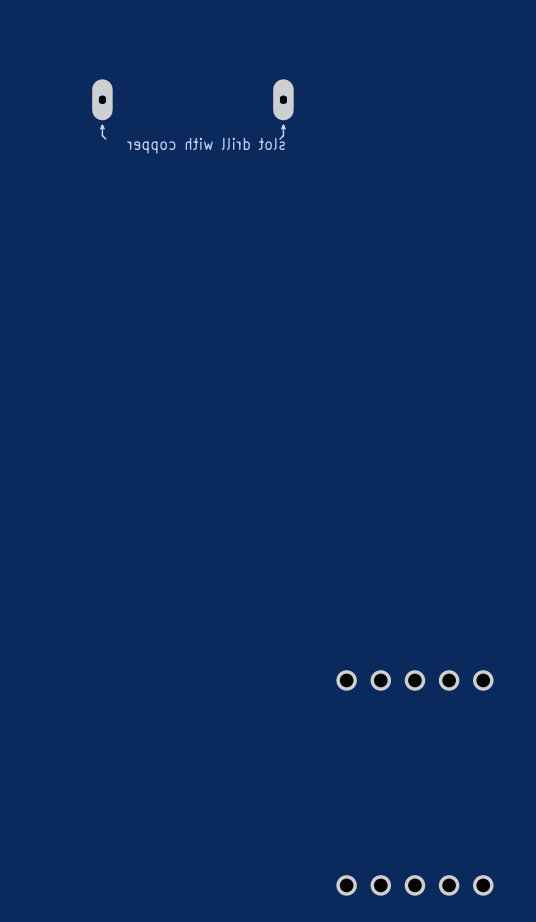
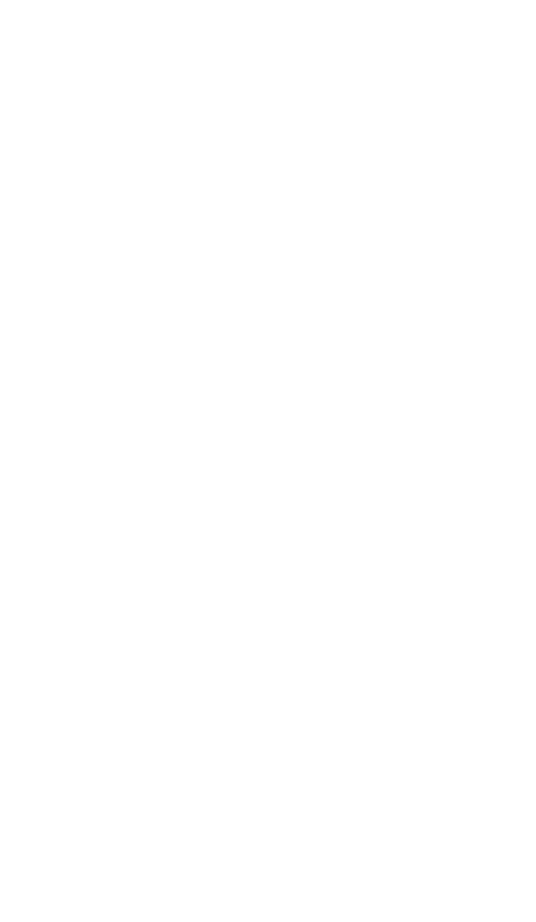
part: (192, 109) -> none
part: (414, 680) -> none
part: (414, 885) -> none

